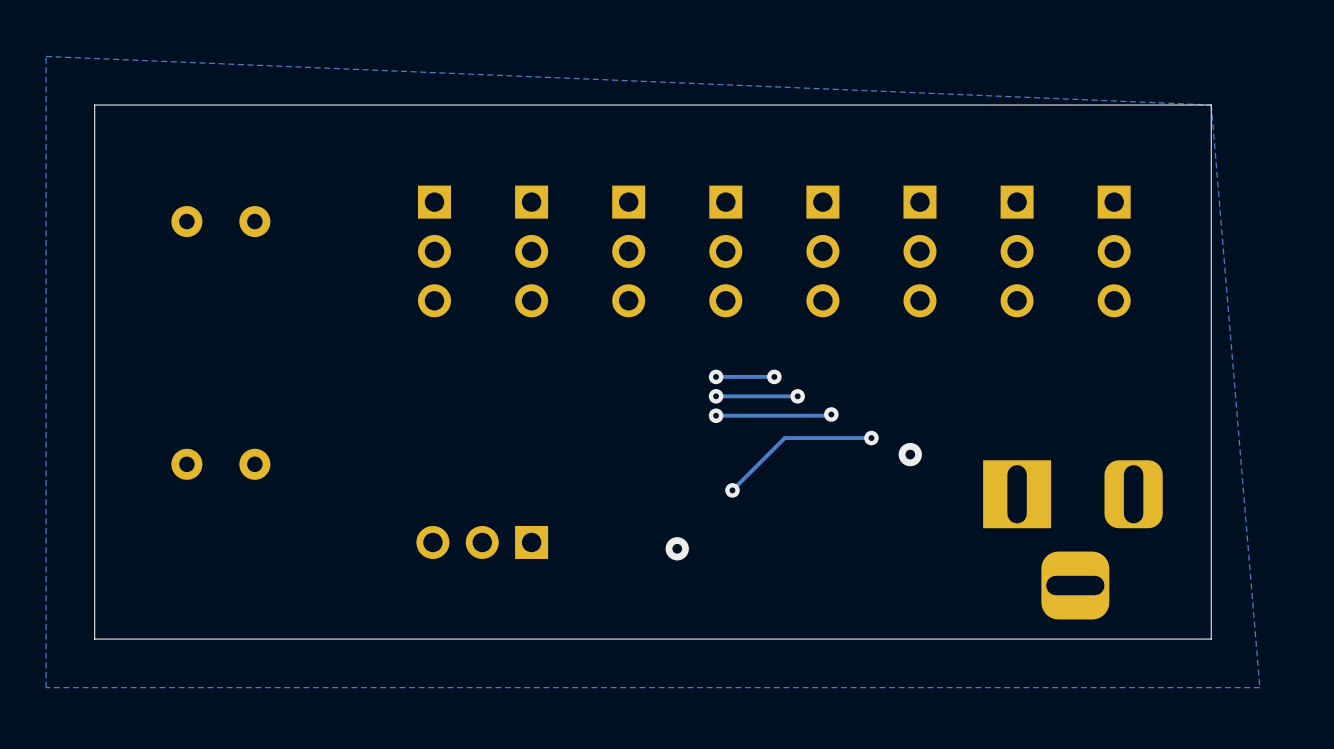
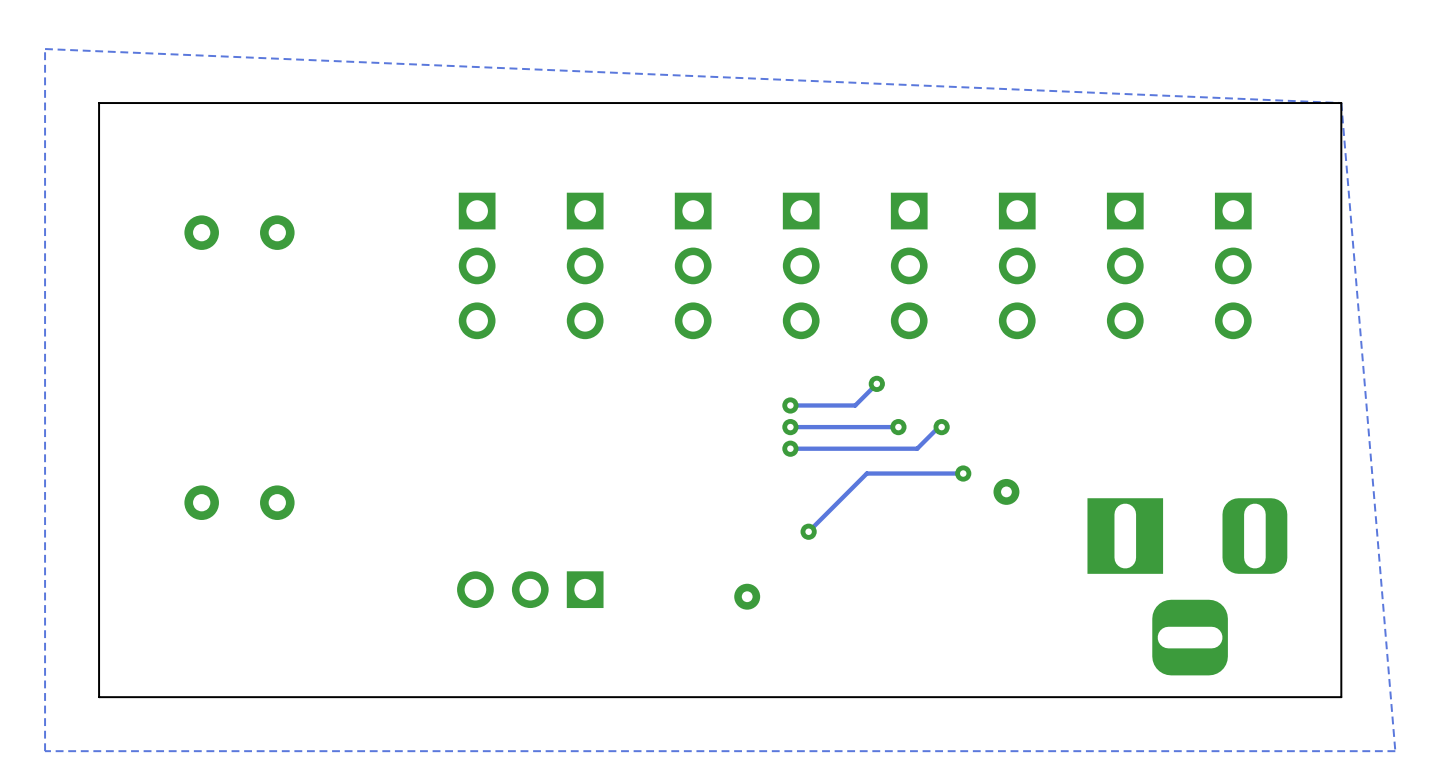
track: none -> (876, 383) (855, 405)
via: none -> (876, 383)
via: (774, 376) -> none
via: (797, 396) -> none
track: none -> (898, 427) (881, 427)
via: none -> (898, 427)
track: none -> (941, 427) (938, 427) (918, 447)
via: none -> (941, 427)
via: (831, 414) -> none

